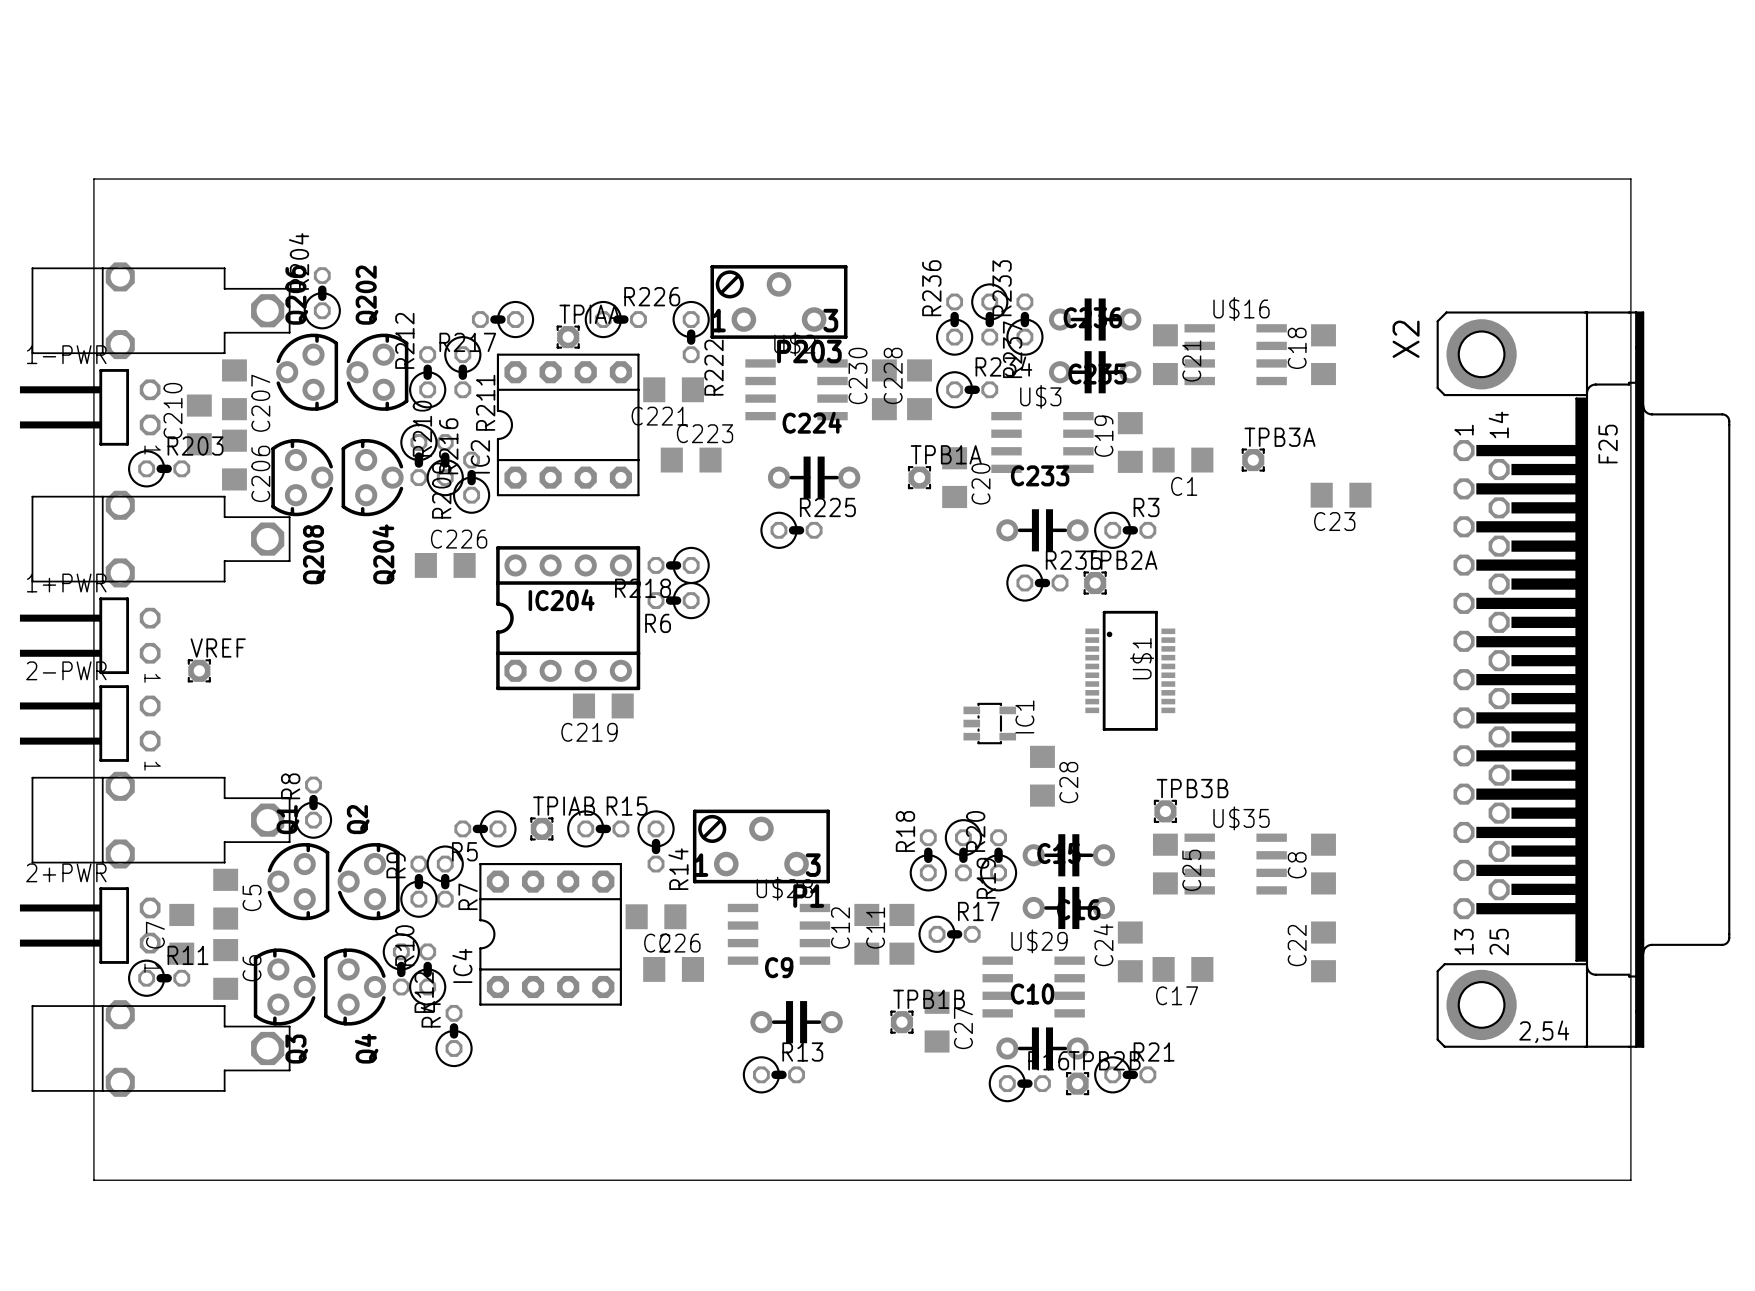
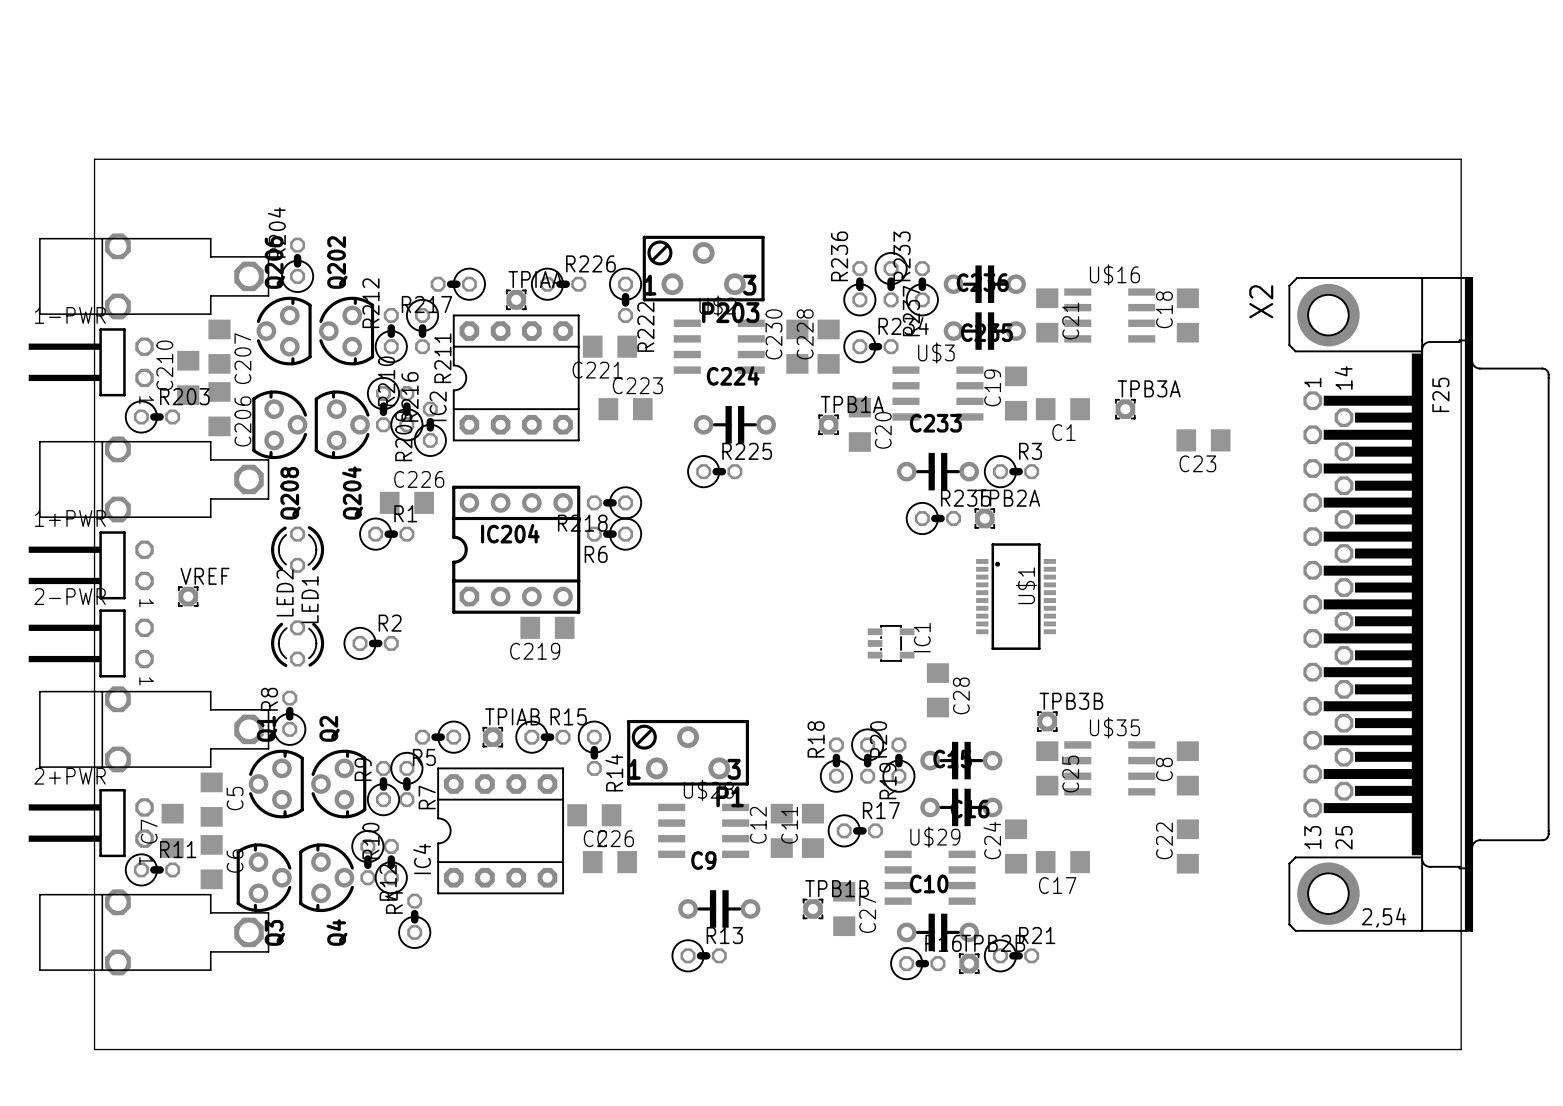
R1: none -> (386, 534)
LED1: none -> (297, 549)
LED2: none -> (297, 643)
R2: none -> (371, 643)

